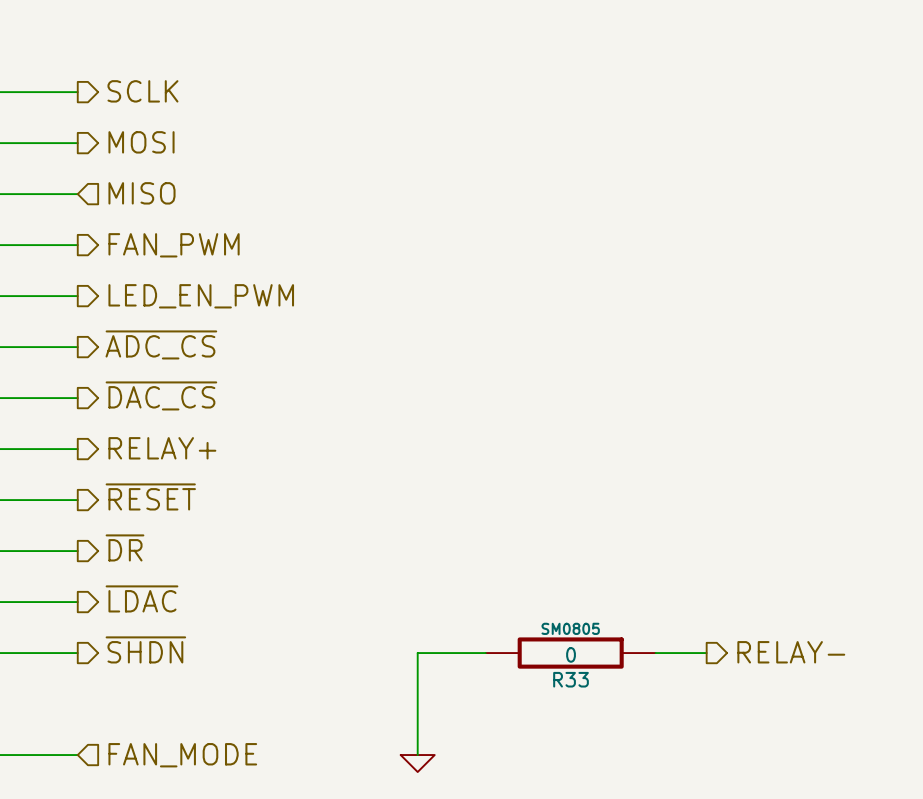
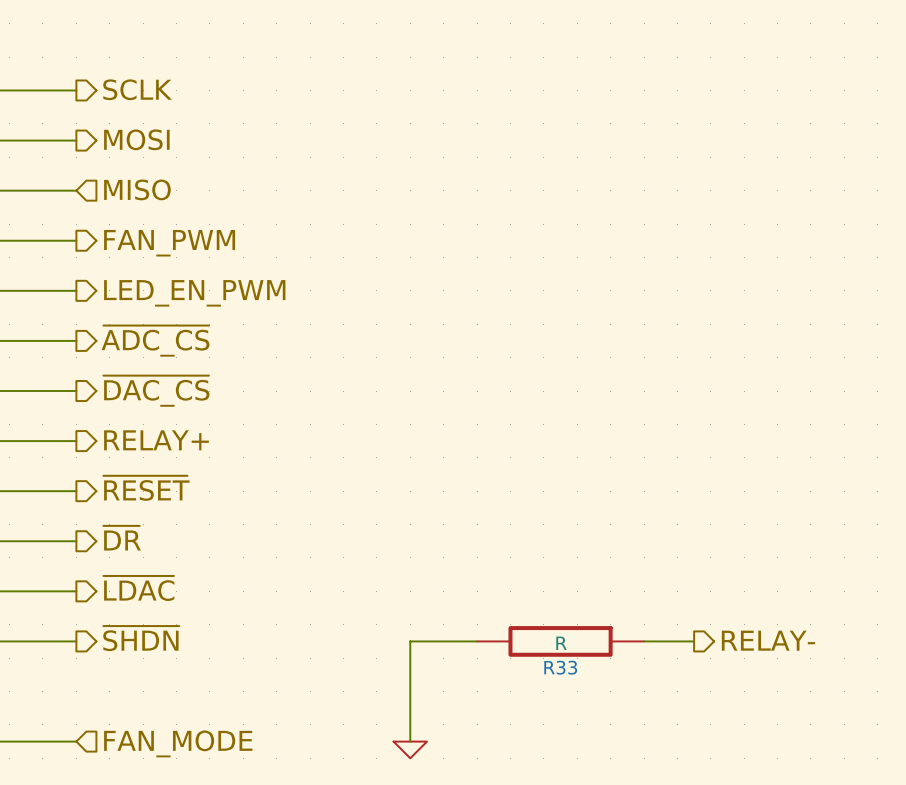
R33 text: SM0805 (570, 628) -> none
R33 value: 0 (571, 654) -> R (561, 643)

